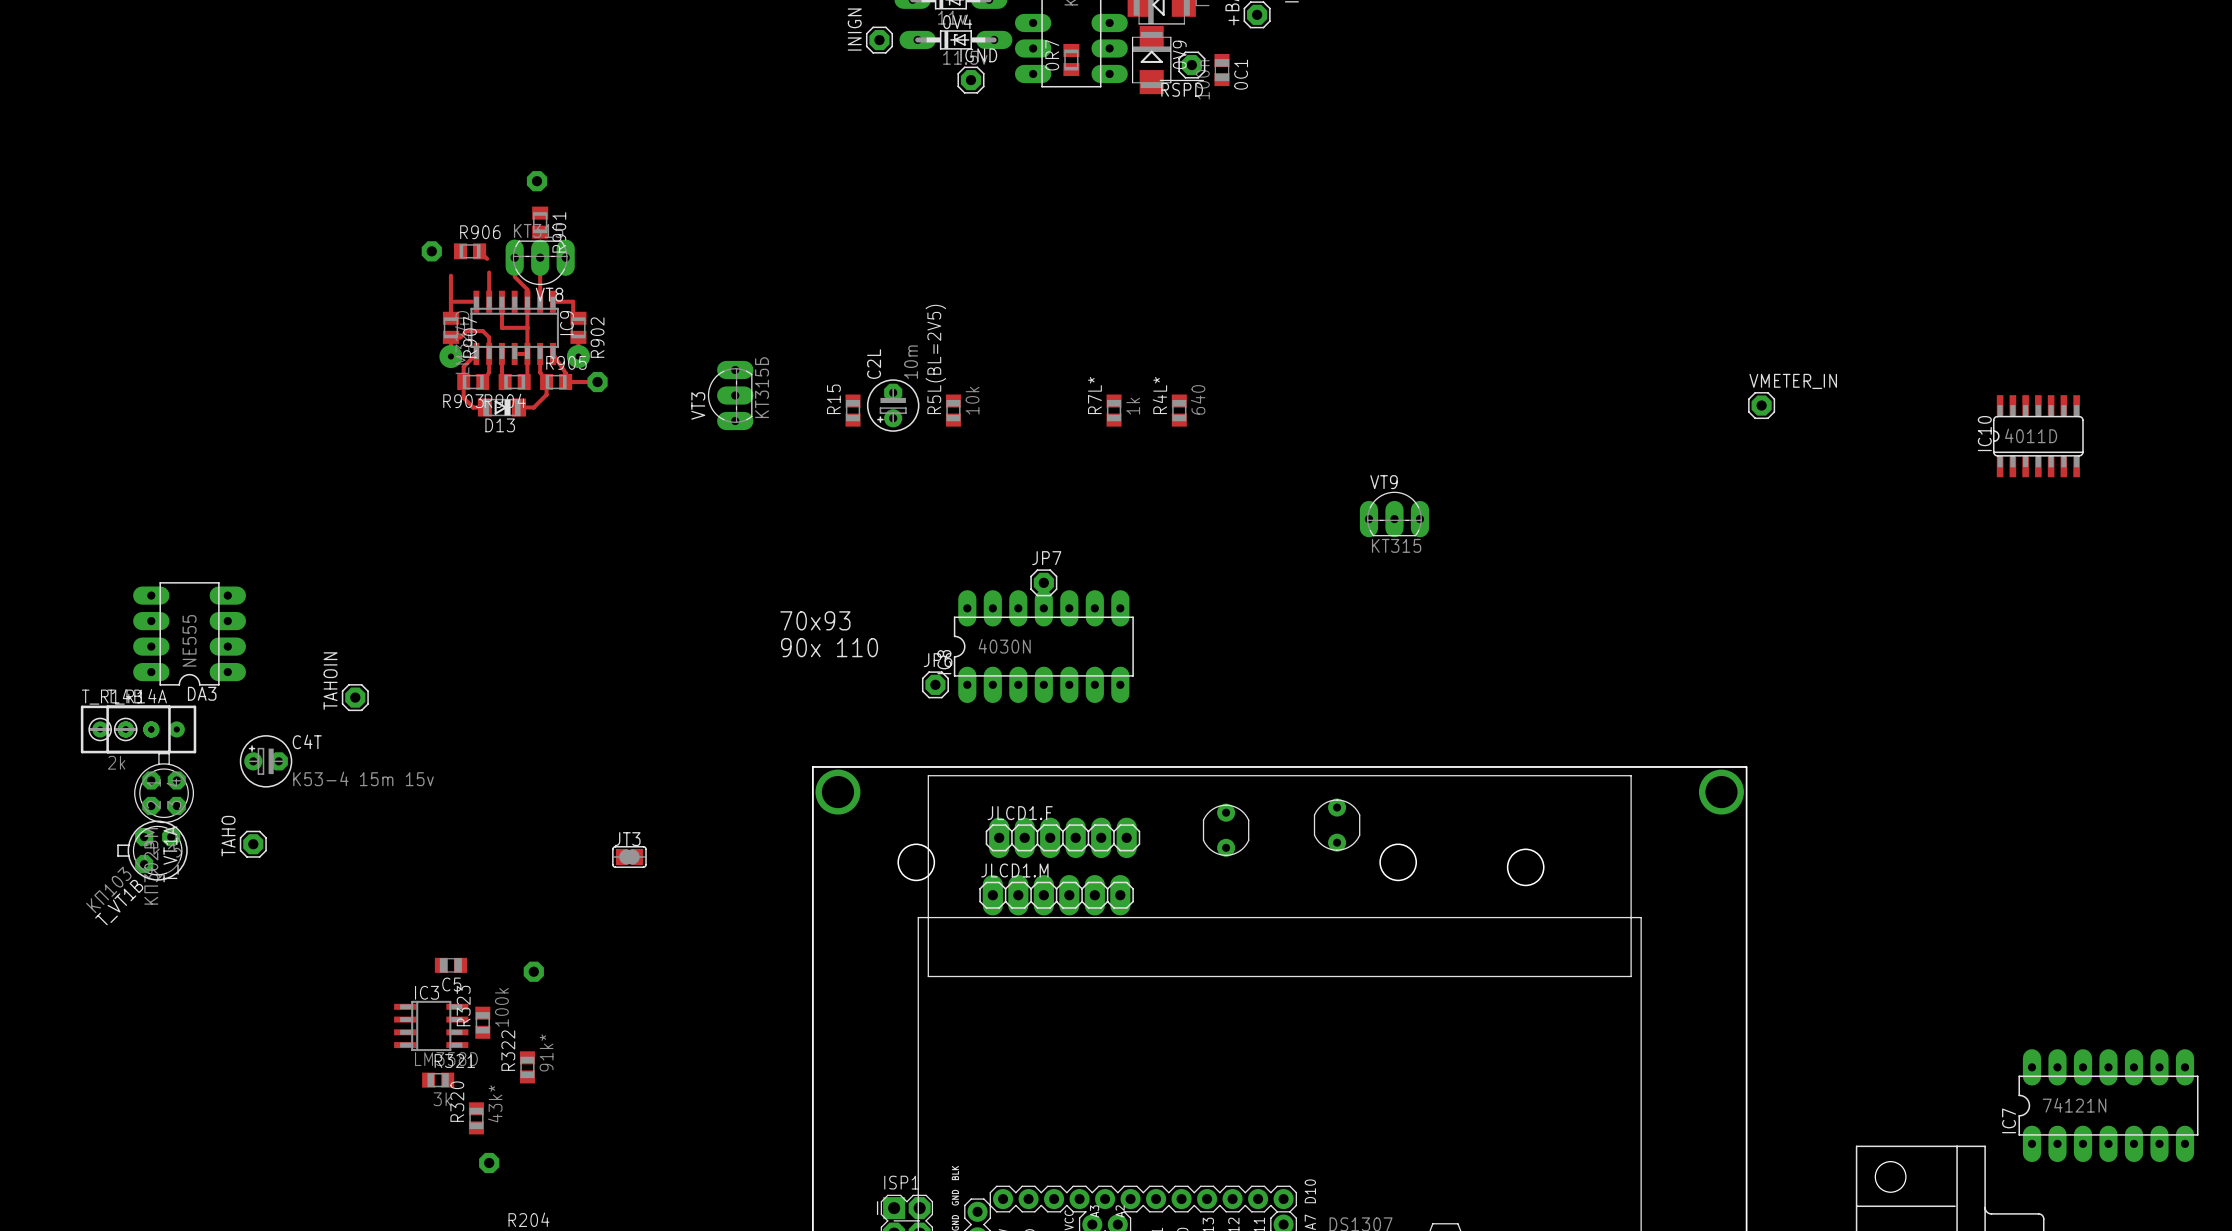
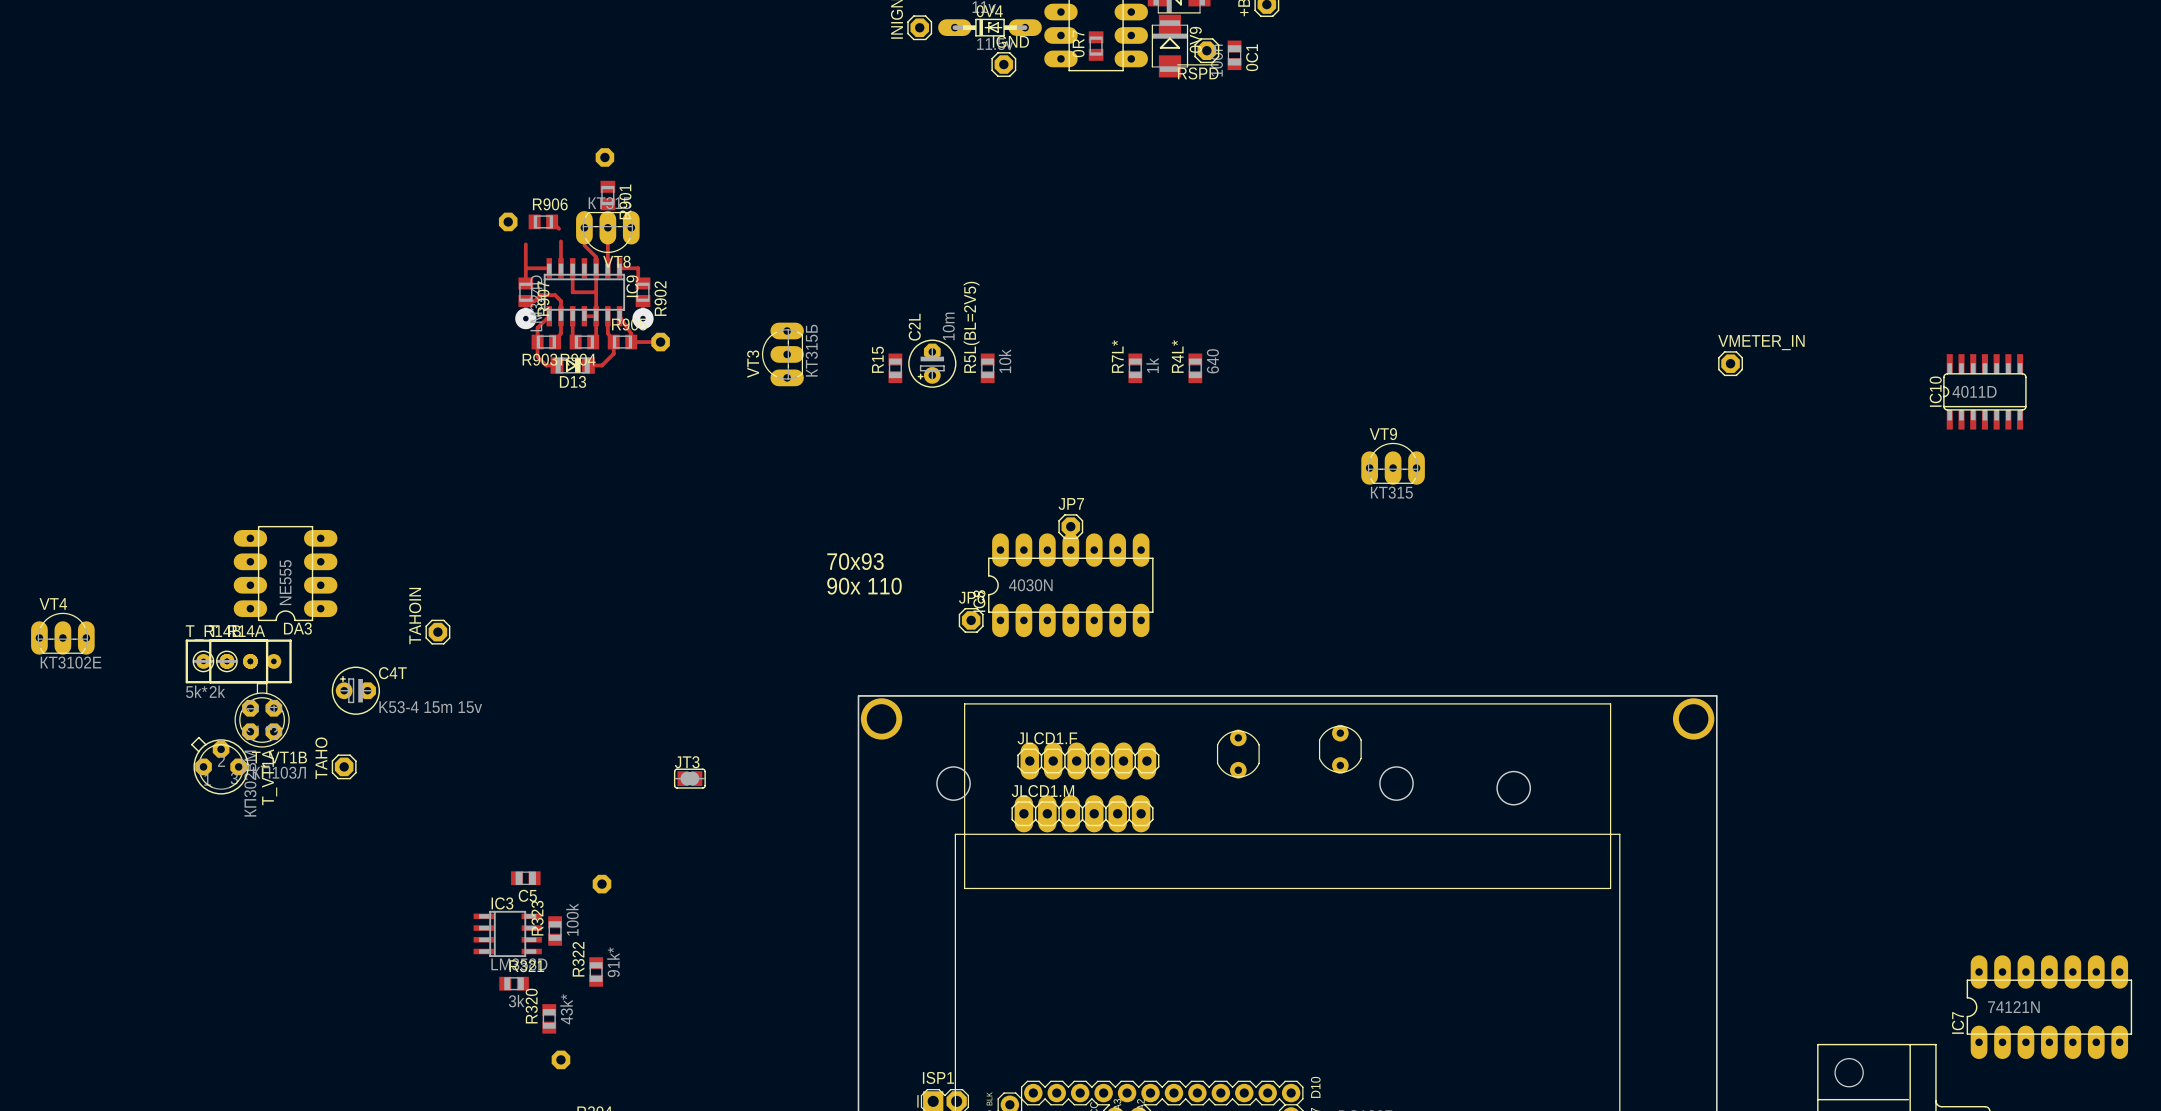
T_R14B value: none -> 5k* (196, 691)
T_VT1B rotation: 0° (152, 850) -> 45° clockwise (219, 765)
T_VT1B value: КП103 (108, 889) -> КП103Л (279, 772)
T_VT1B name position: T_VT1B (119, 902) -> T_VT1B (279, 759)

